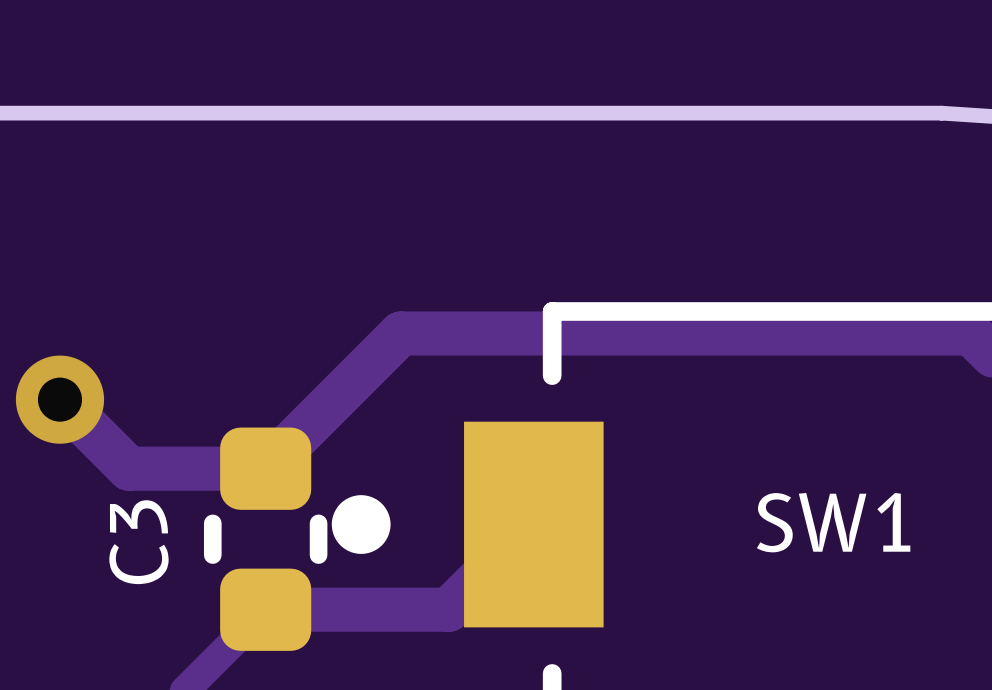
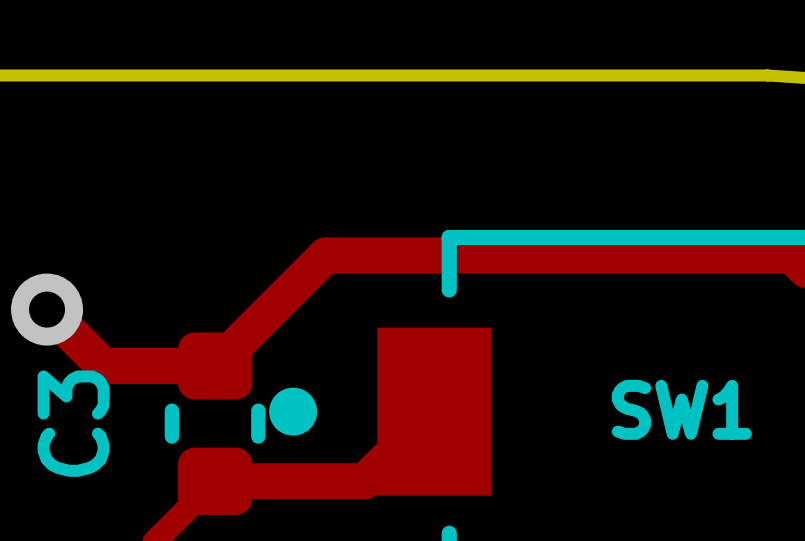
C3 name position: C3 (138, 542) -> C3 (73, 423)

